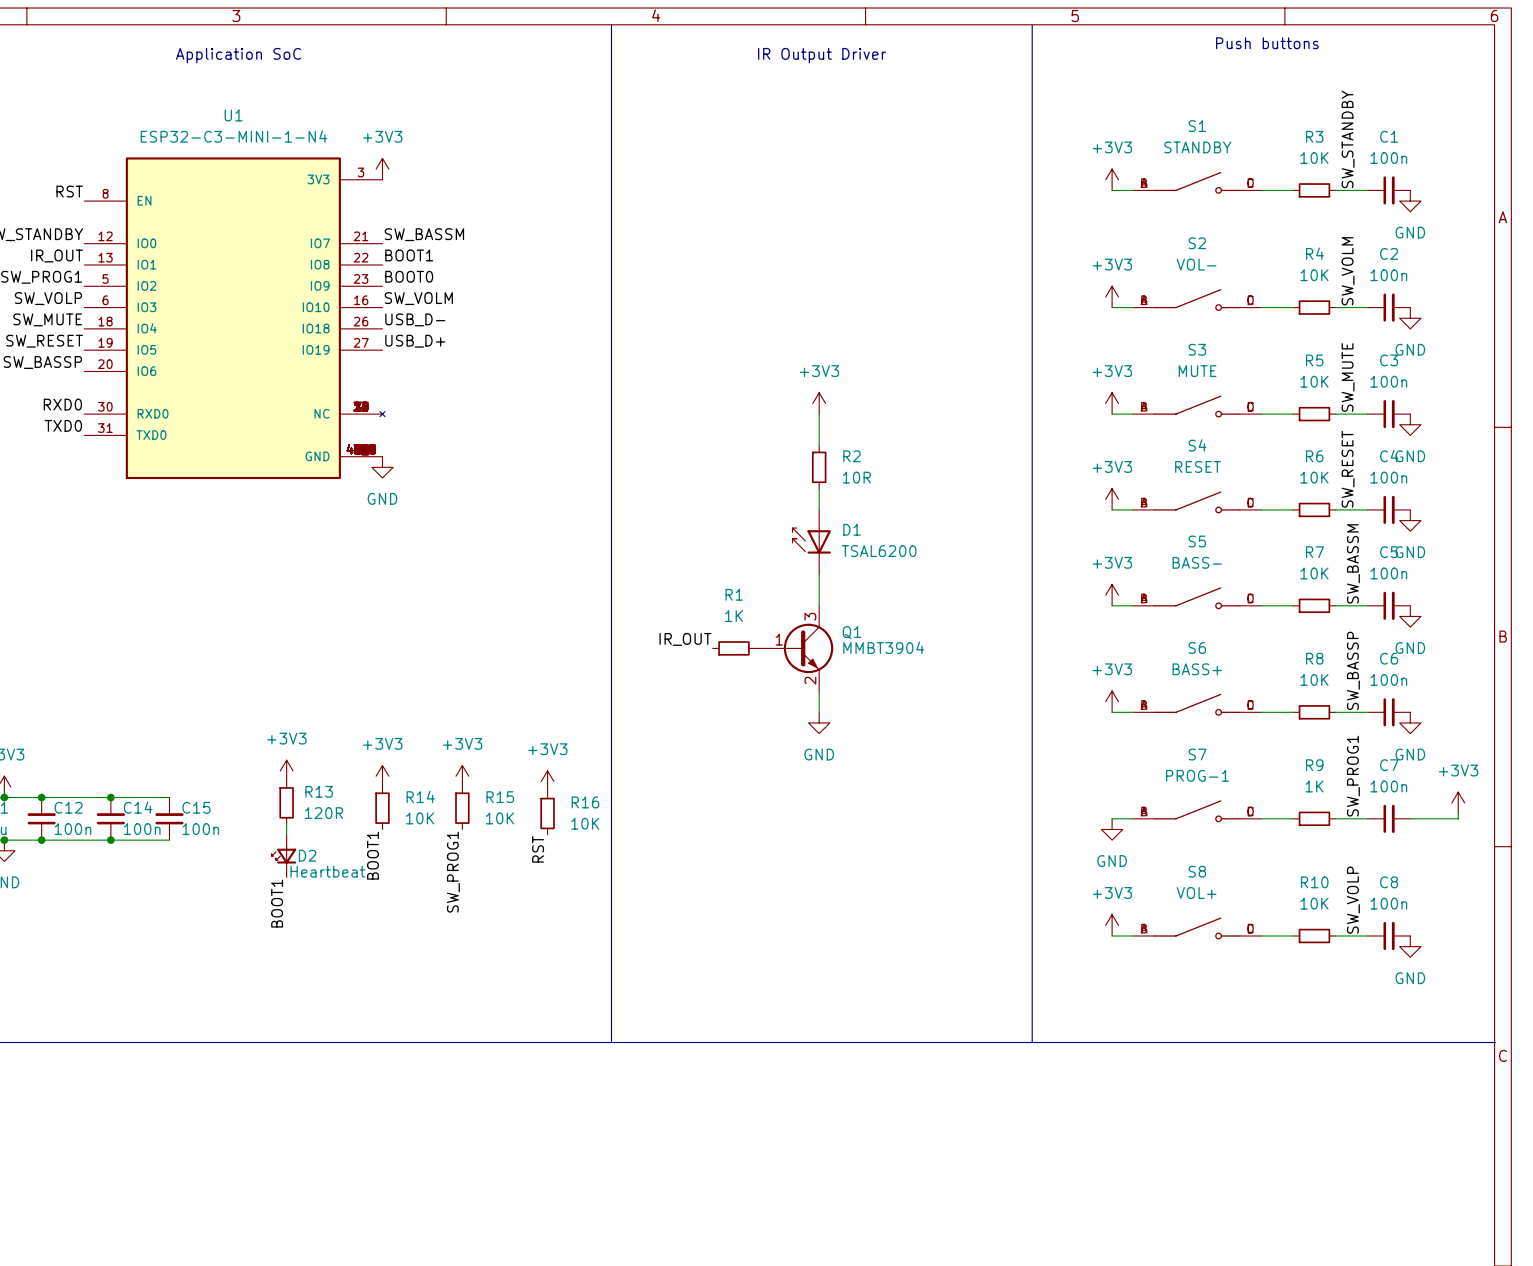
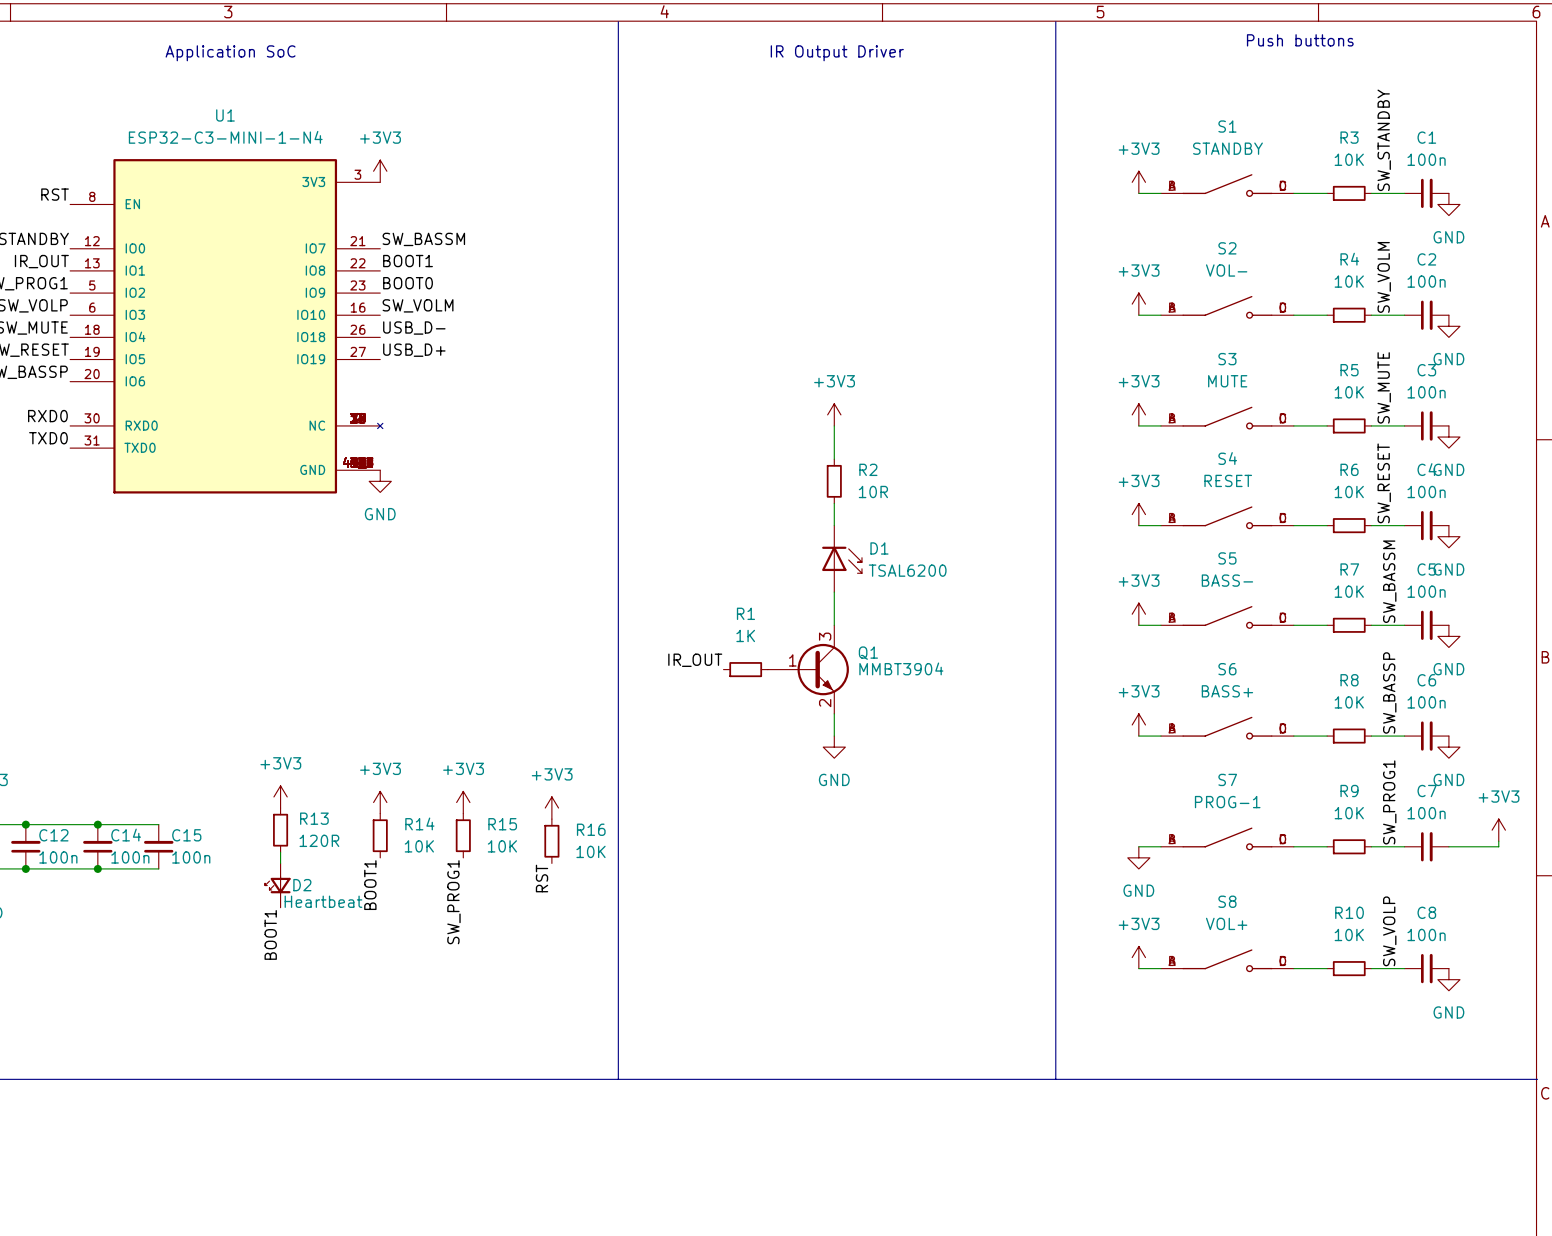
D1 rotation: 0° (811, 540) -> 180° (842, 559)
R9 value: 1K (1314, 786) -> 10K (1349, 813)

